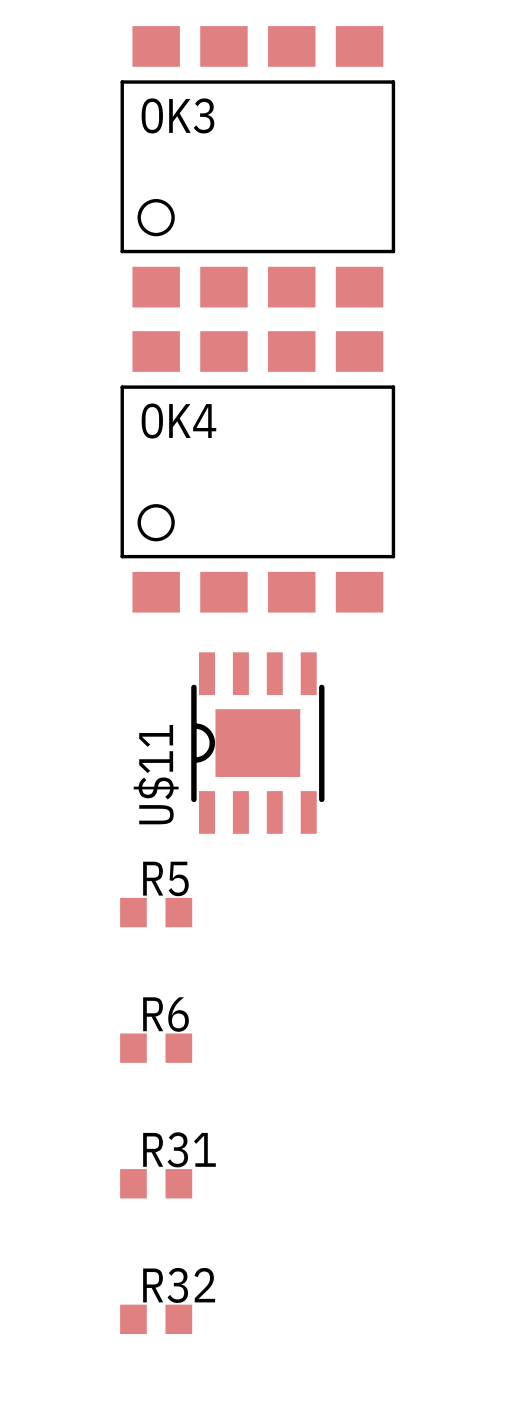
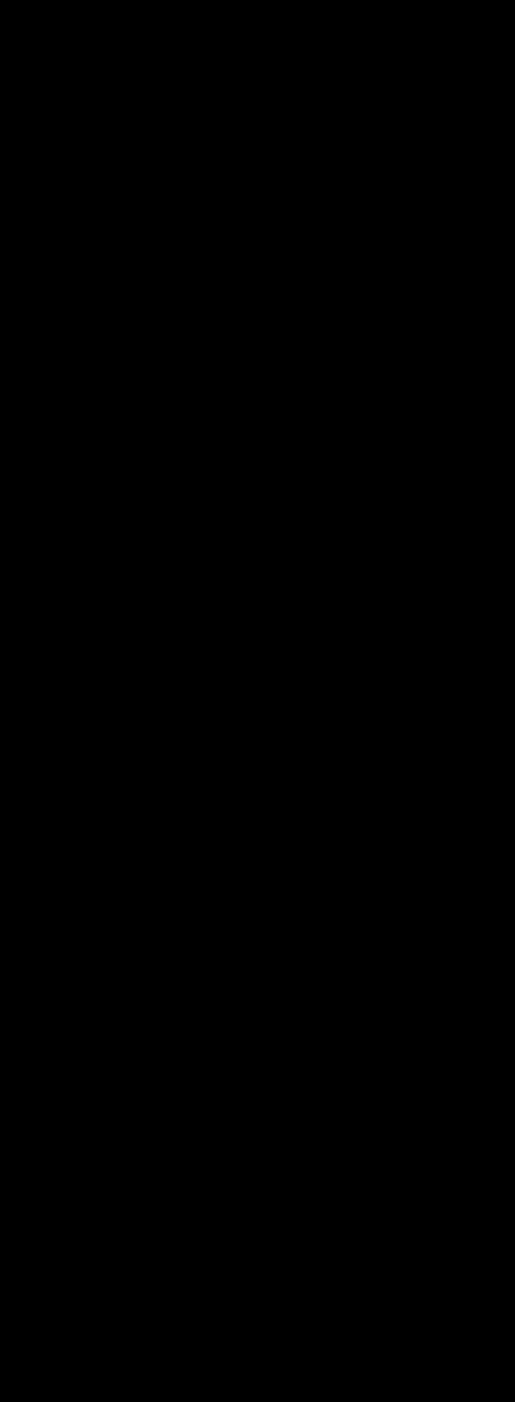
OK3: (257, 166) -> none
OK4: (257, 471) -> none
U$11: (257, 743) -> none
R5: (156, 912) -> none
R6: (156, 1048) -> none
R31: (156, 1183) -> none
R32: (156, 1319) -> none

